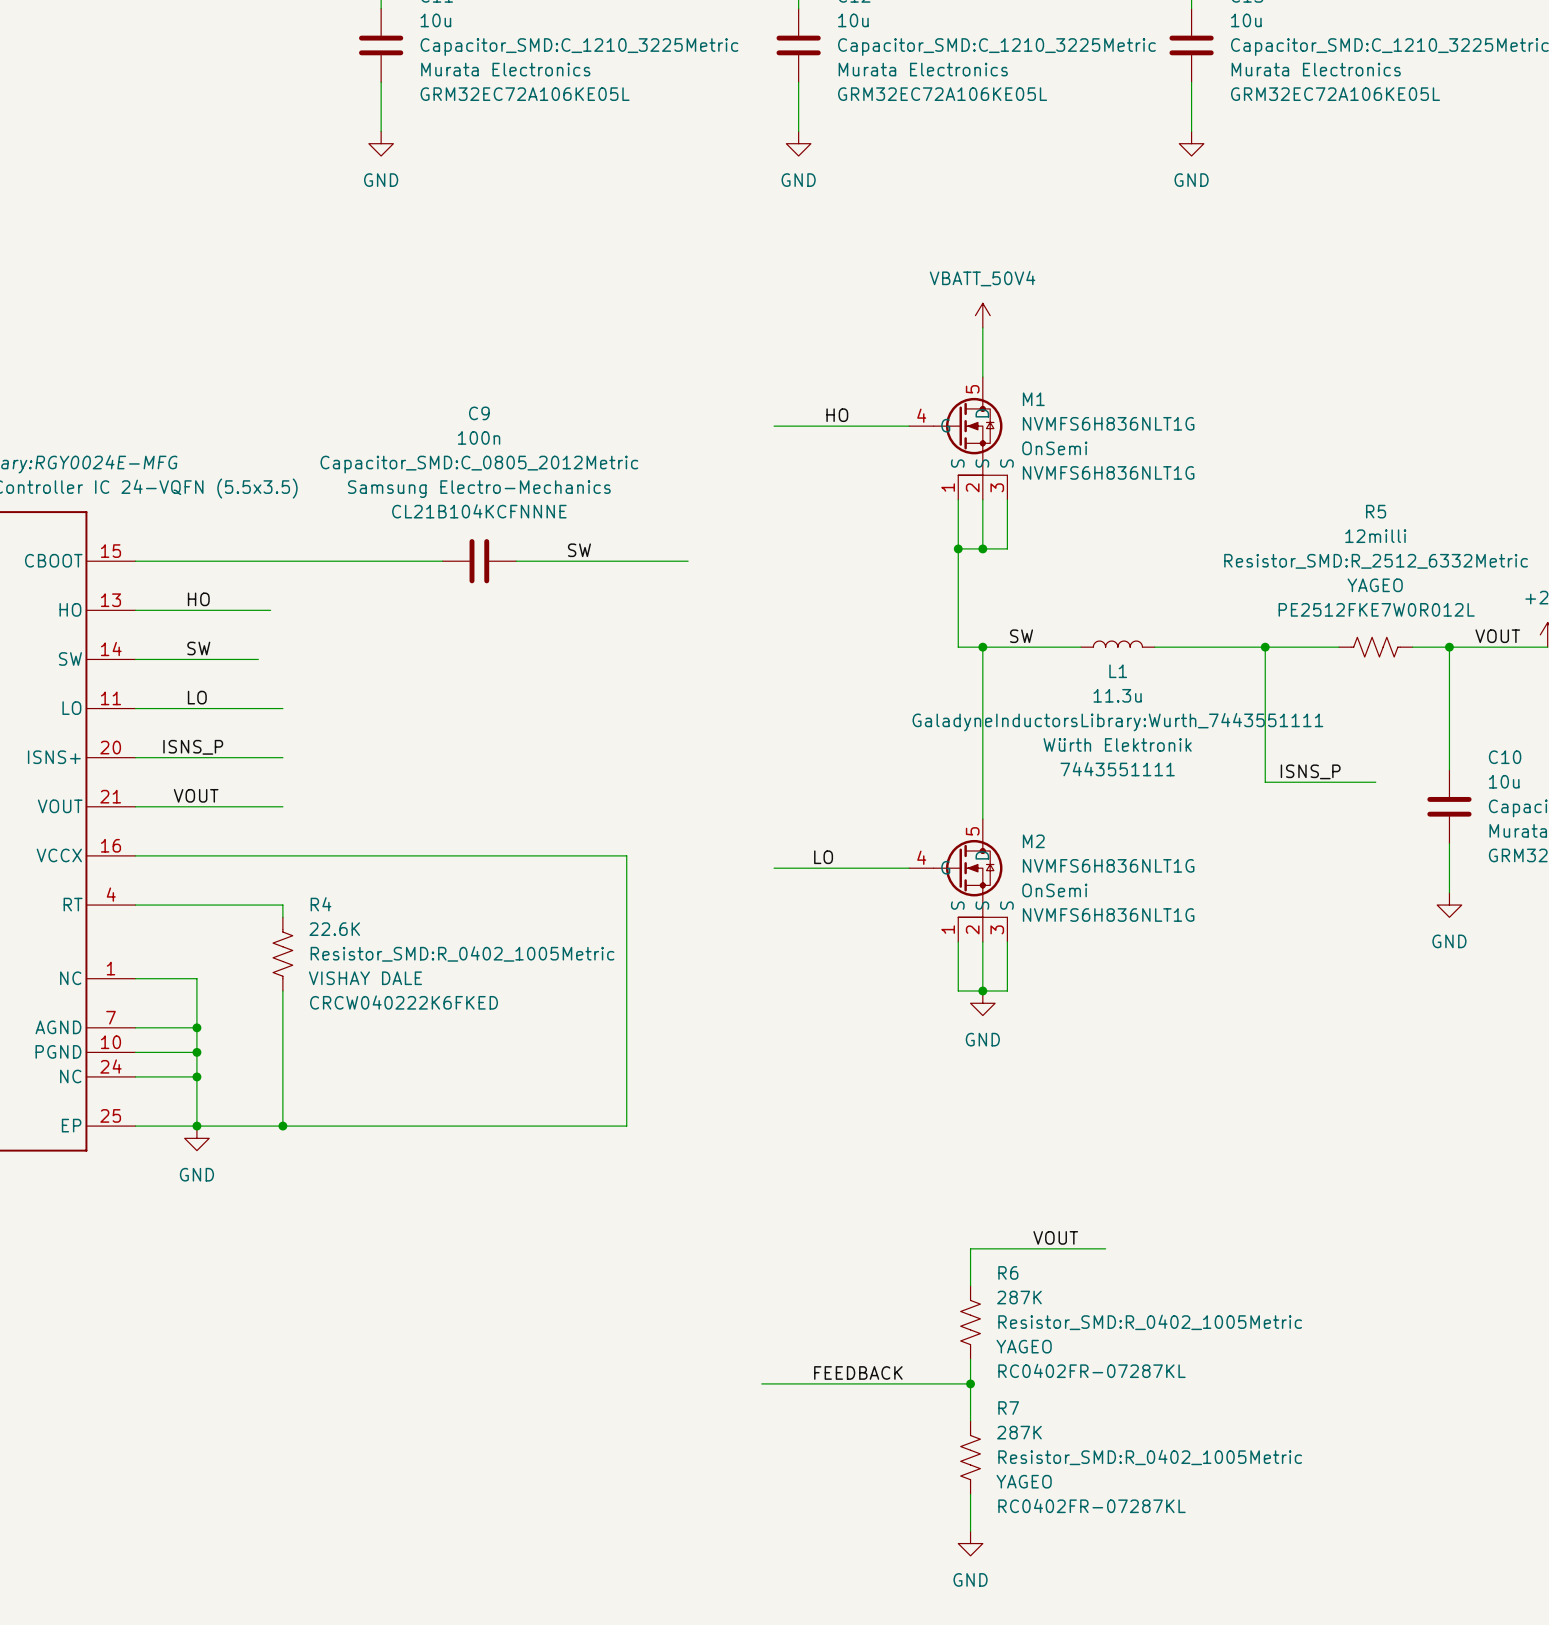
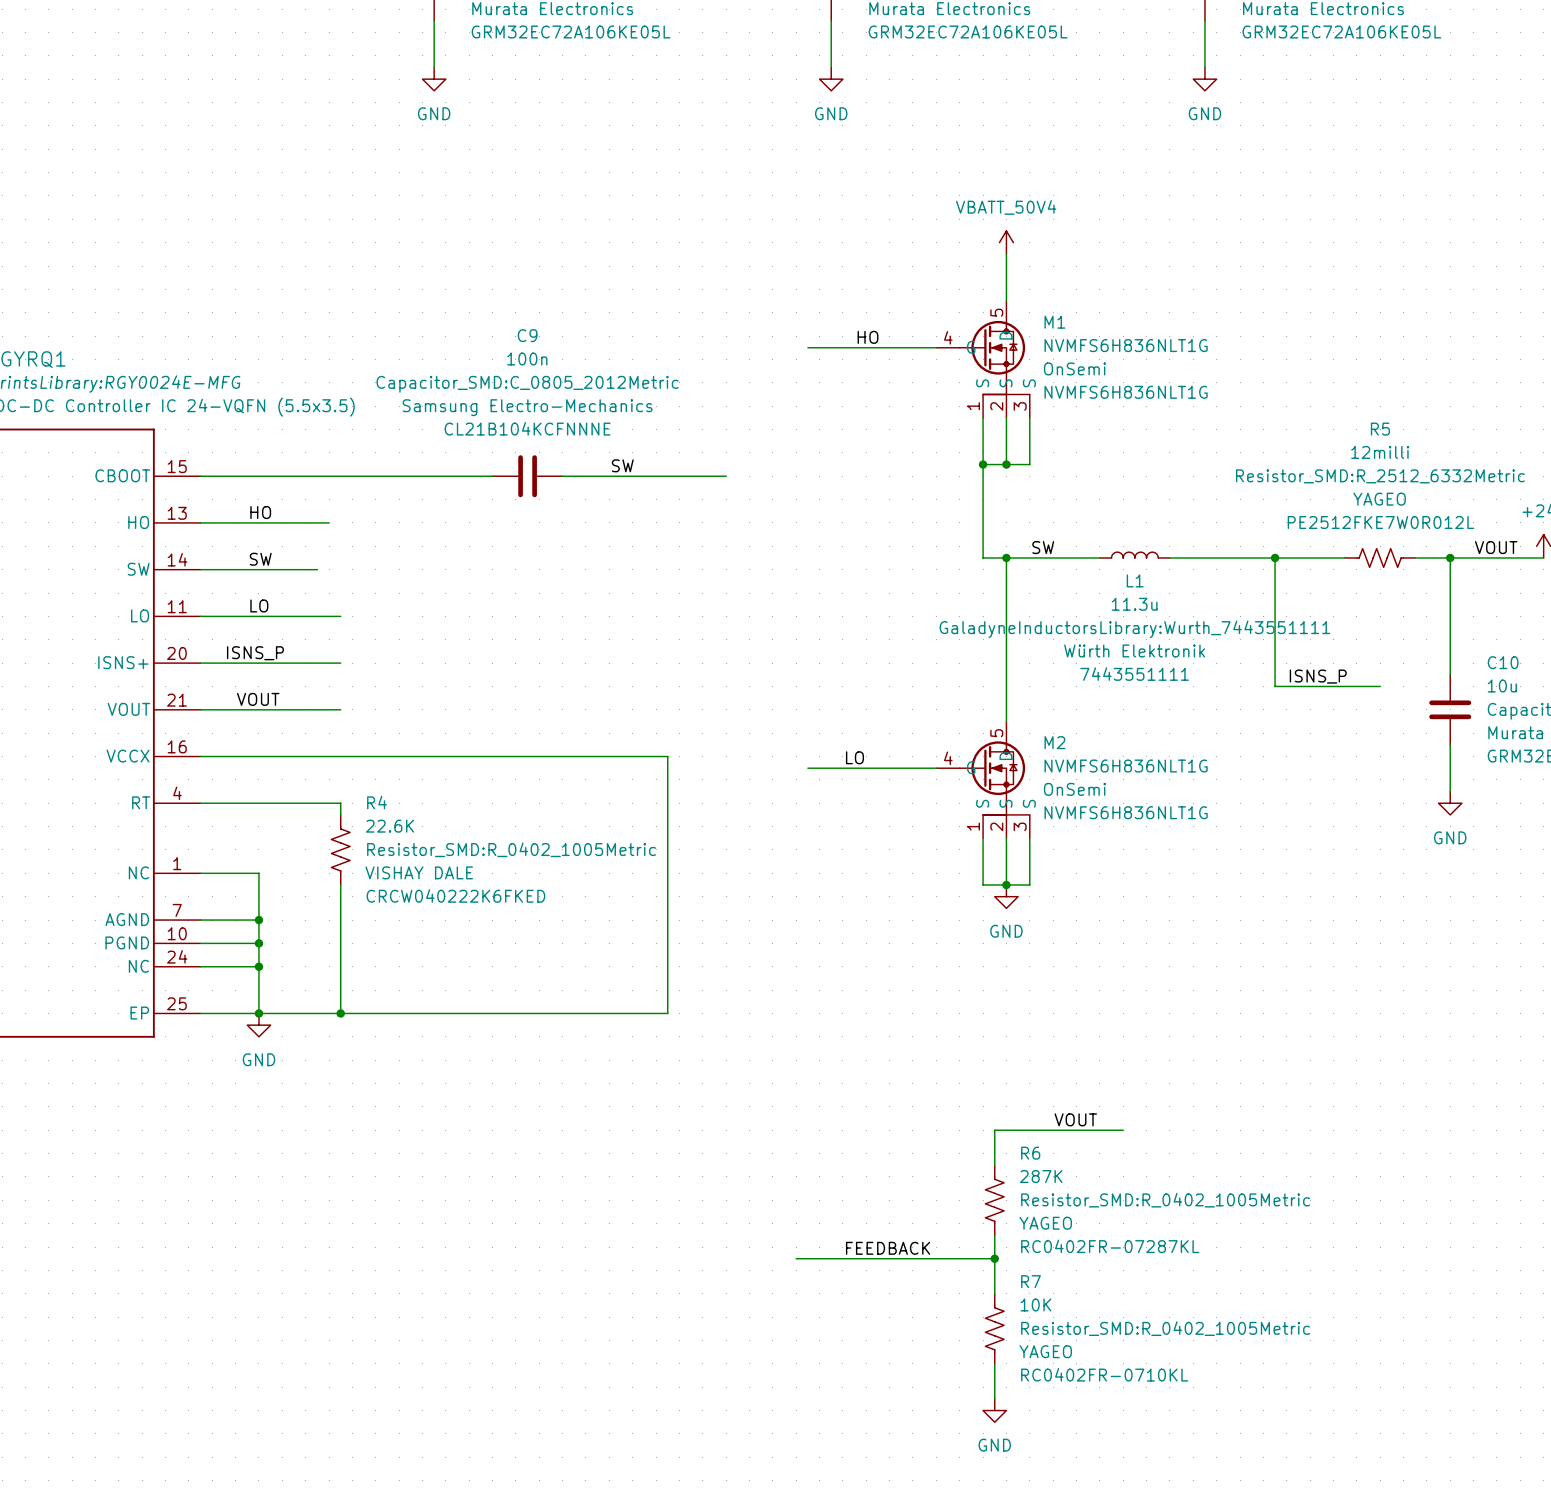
R7 value: 287K (1019, 1432) -> 10K (1035, 1305)
R7 text: RC0402FR-07287KL (1091, 1505) -> RC0402FR-0710KL (1104, 1374)

